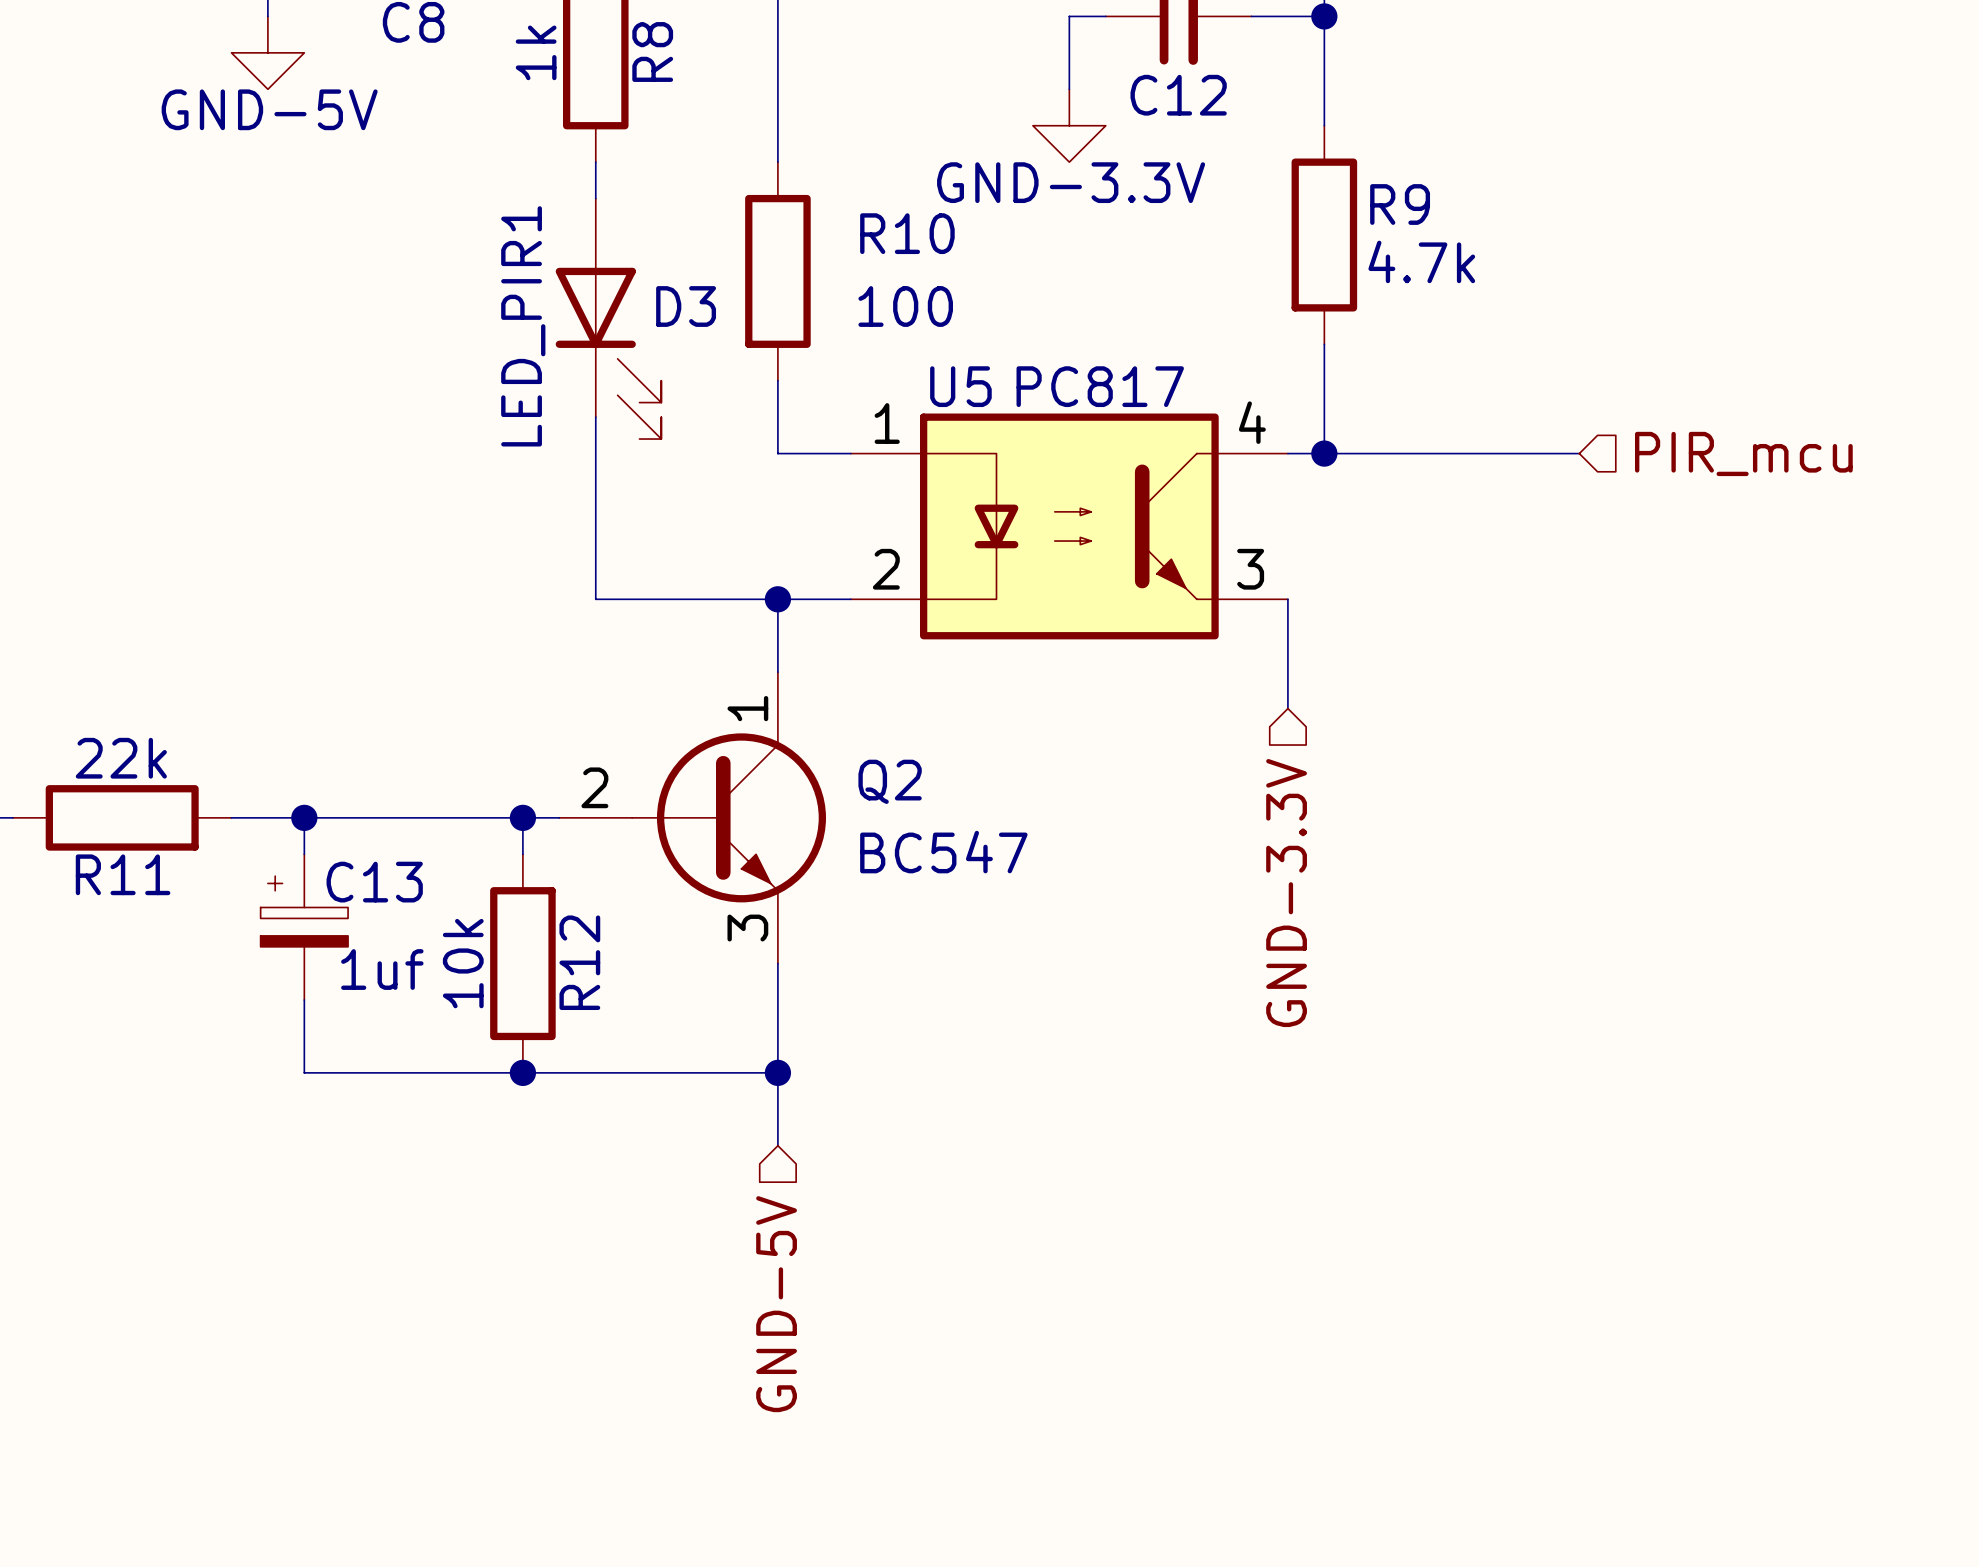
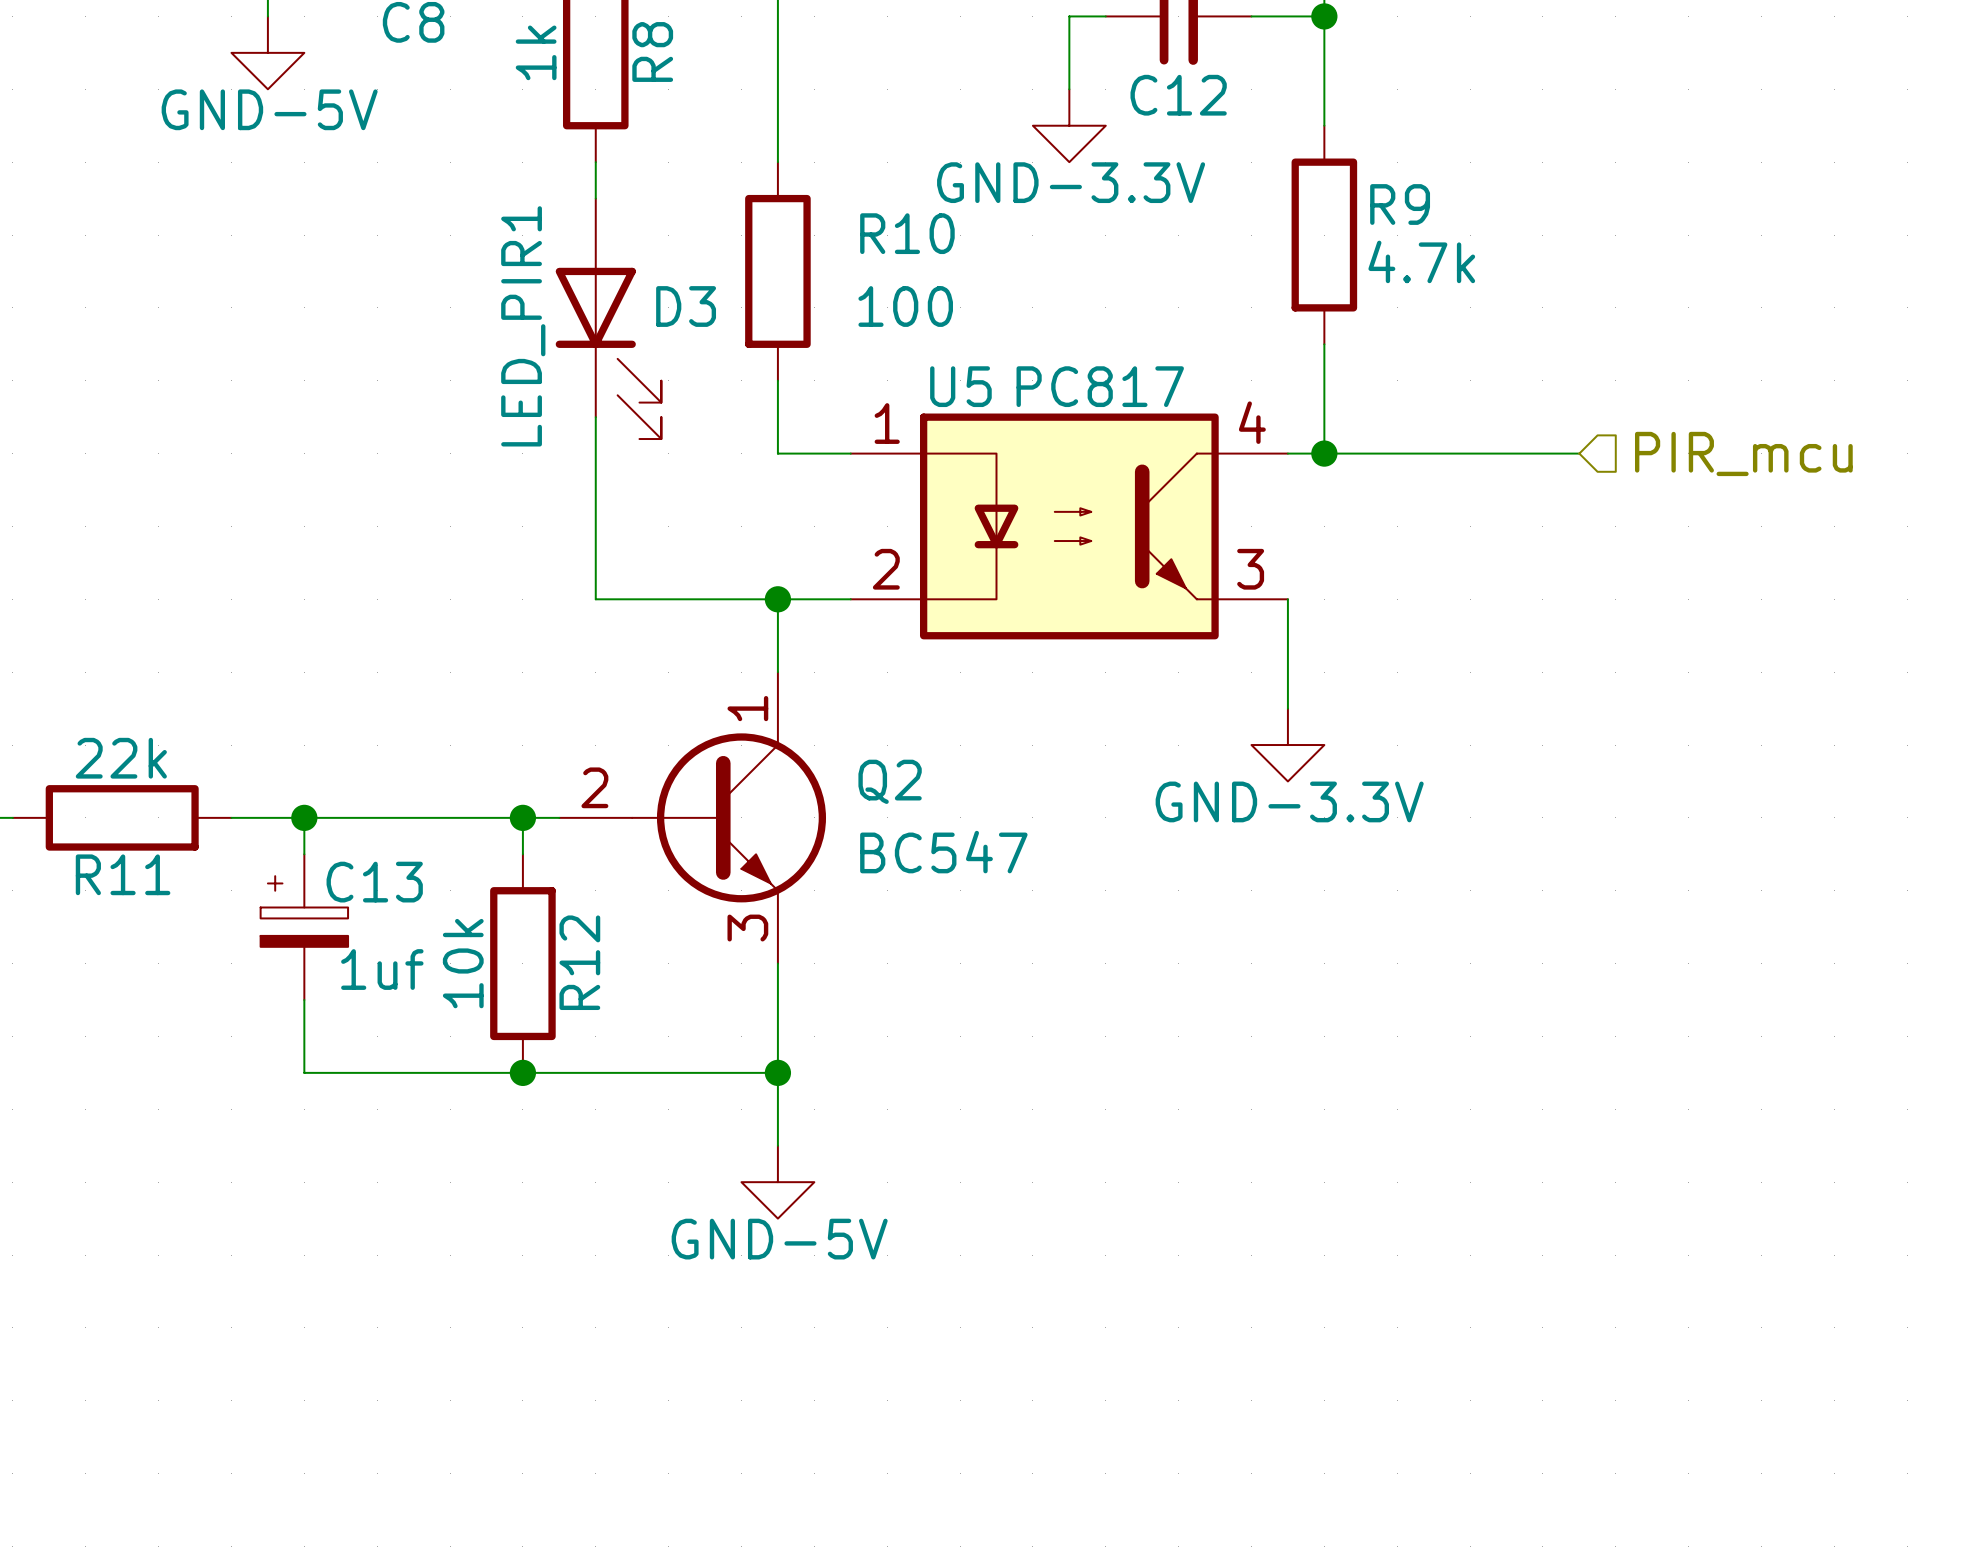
power symbol: none -> GND-3.3V (1287, 745)
hierarchical label: GND-3.3V (1286, 893) -> none
power symbol: none -> GND-5V (777, 1182)
hierarchical label: GND-5V (776, 1304) -> none

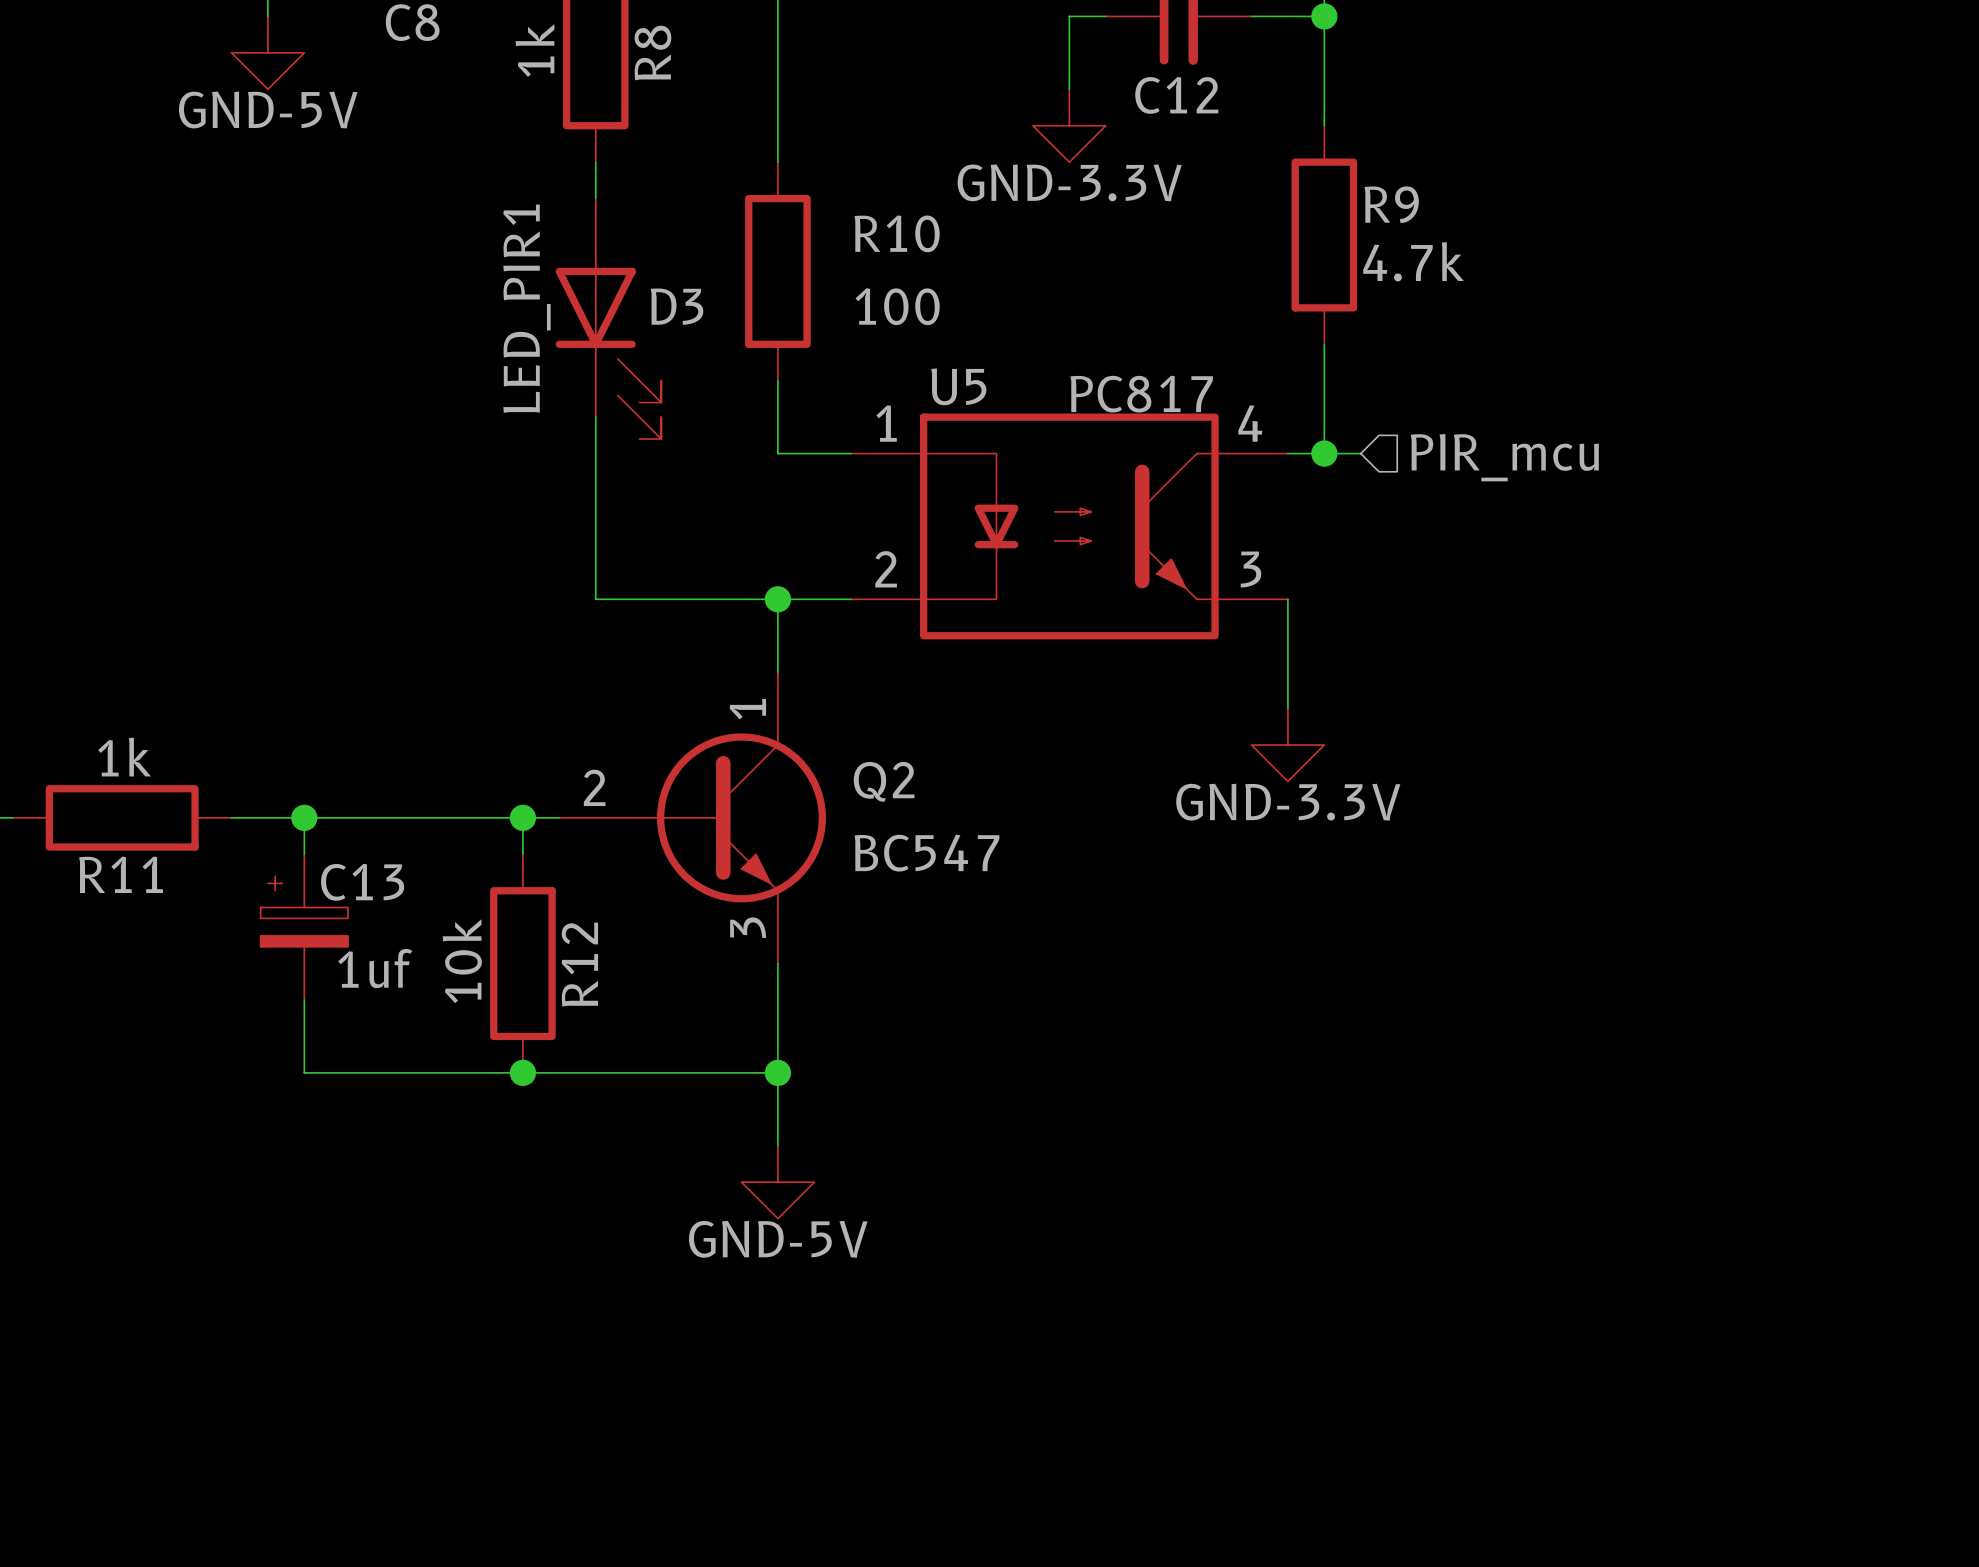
U5 value position: PC817 (1100, 386) -> PC817 (1141, 394)
wire: (1360, 453) (1579, 453) -> none
hierarchical label position: PIR_mcu (1743, 453) -> PIR_mcu (1504, 457)
R11 value: 22k (121, 758) -> 1k (124, 757)

